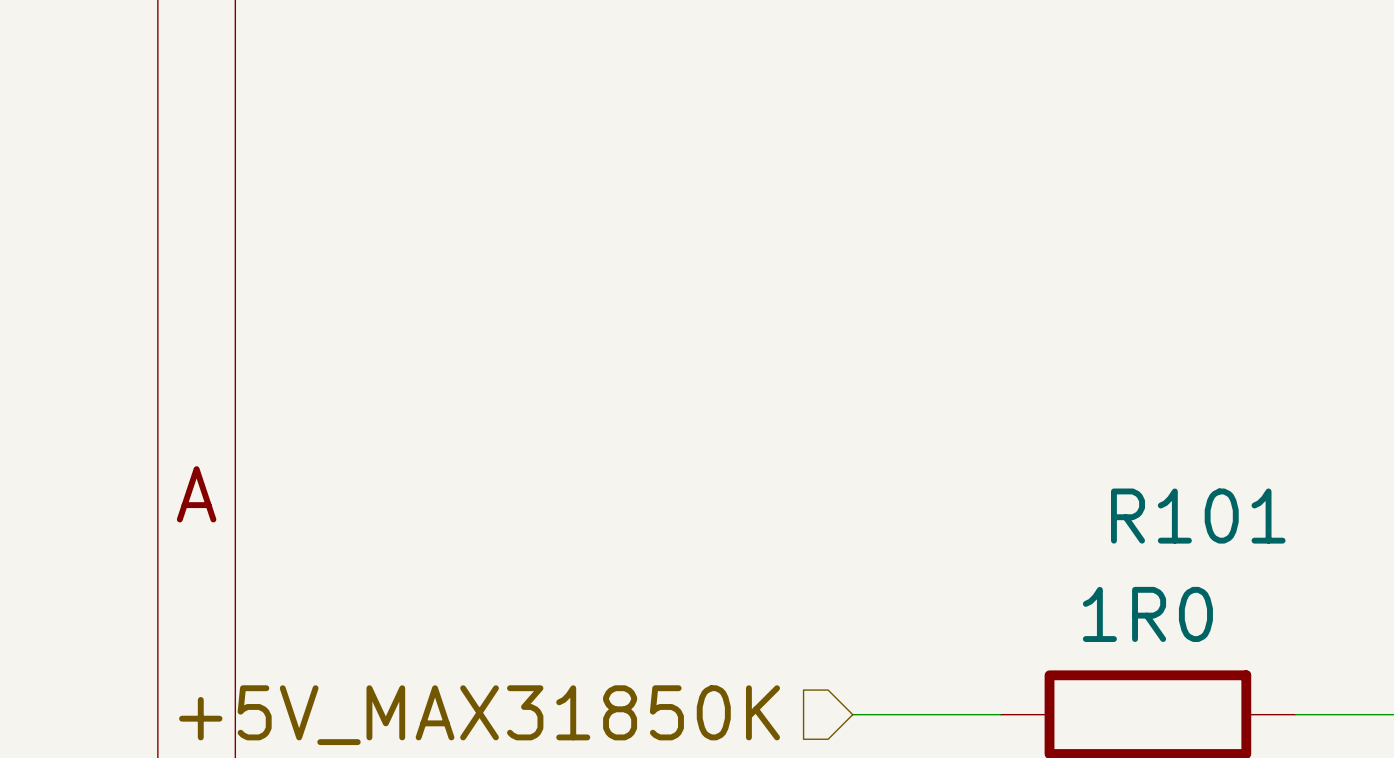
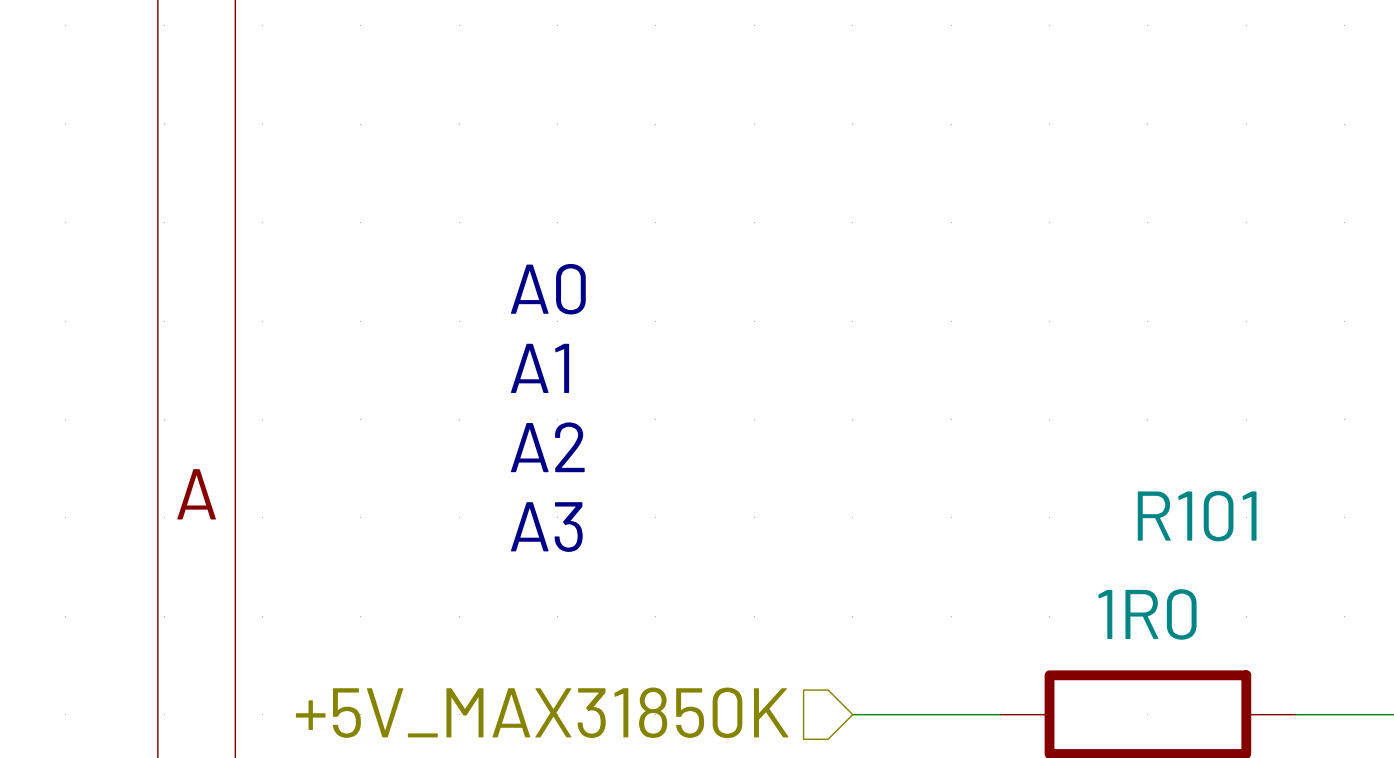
text: none -> A0 (548, 289)
text: none -> A1 (539, 368)
text: none -> A2 (547, 447)
text: none -> A3 (546, 527)

